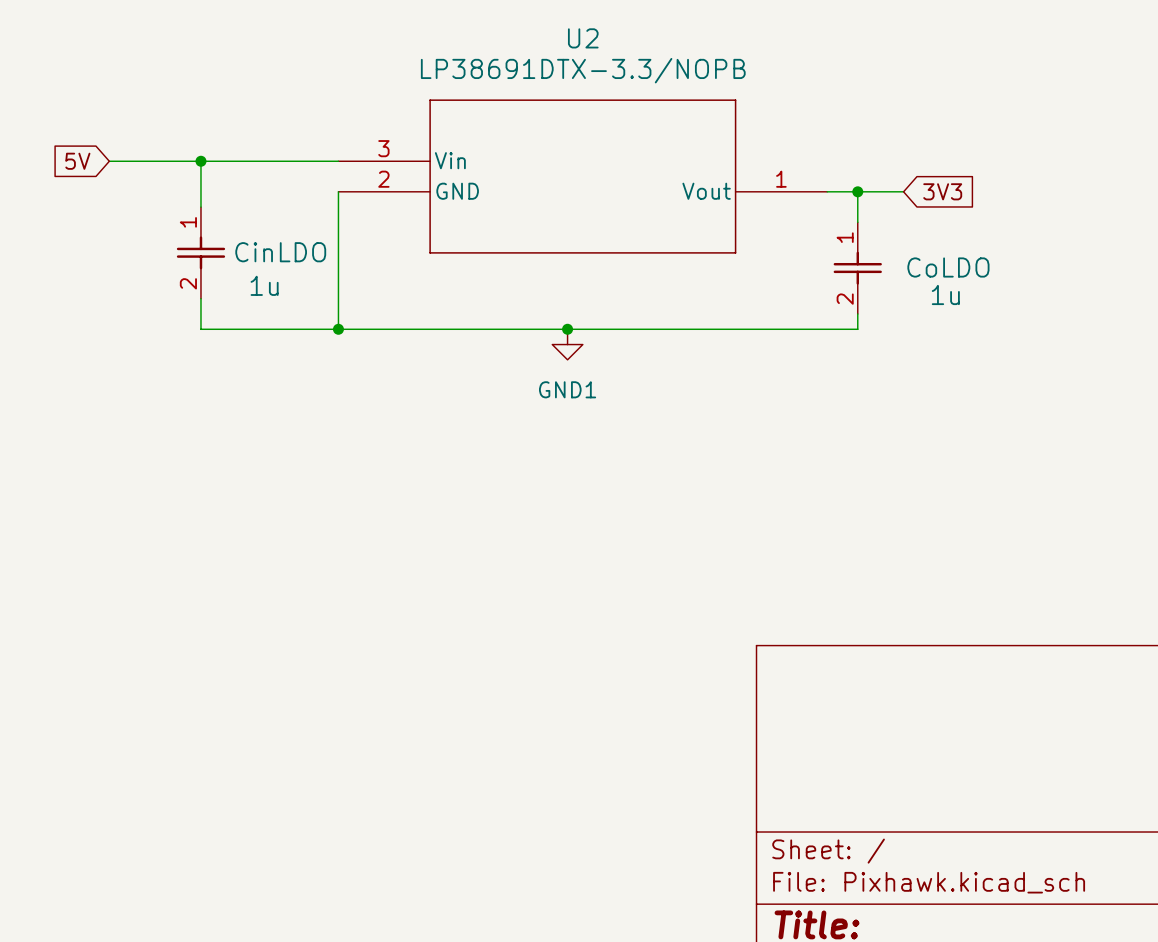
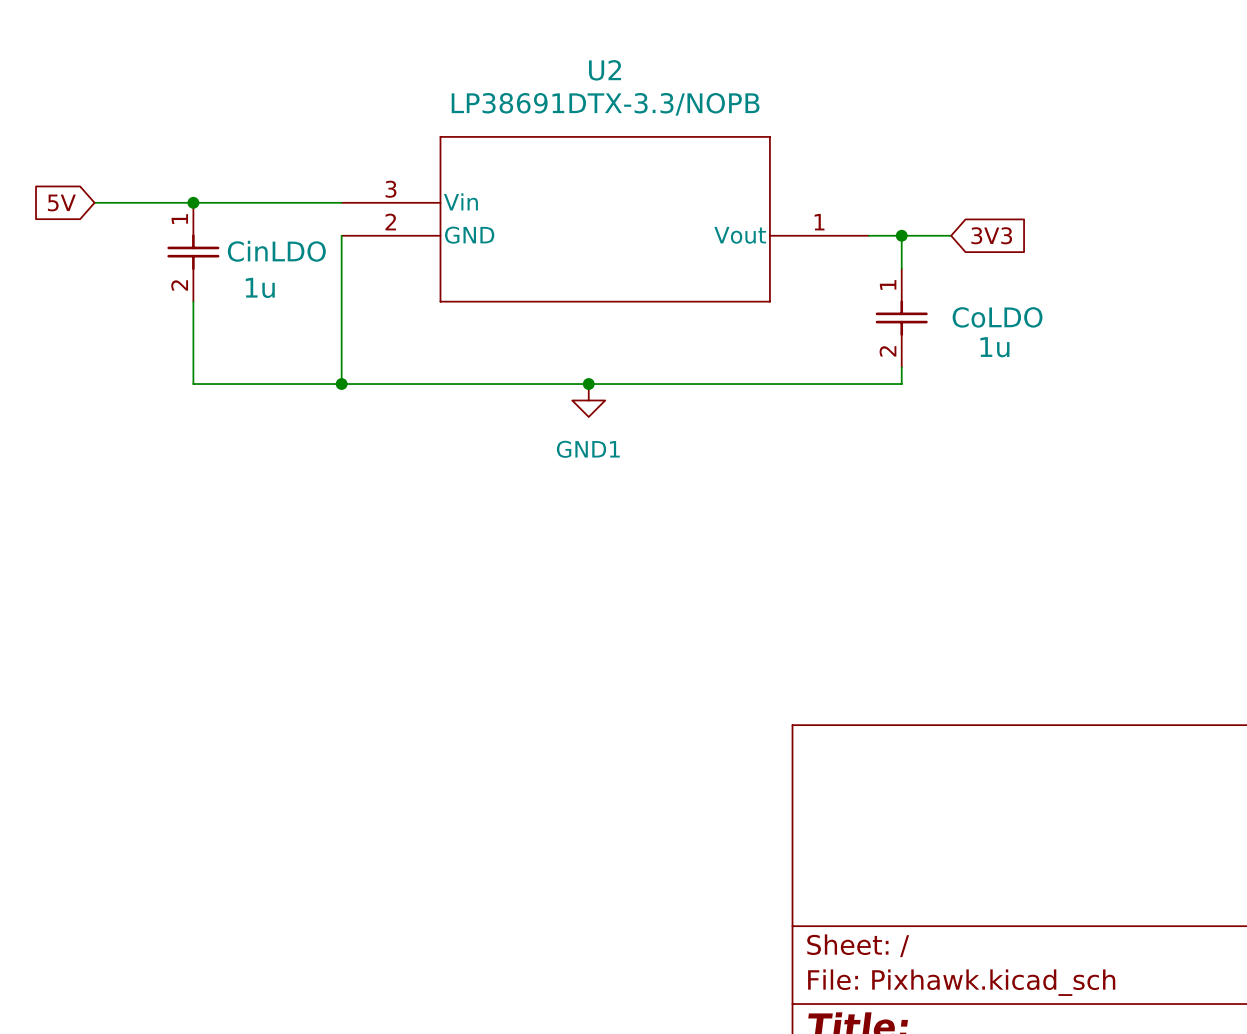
CinLDO position: (200, 252) -> (193, 252)

